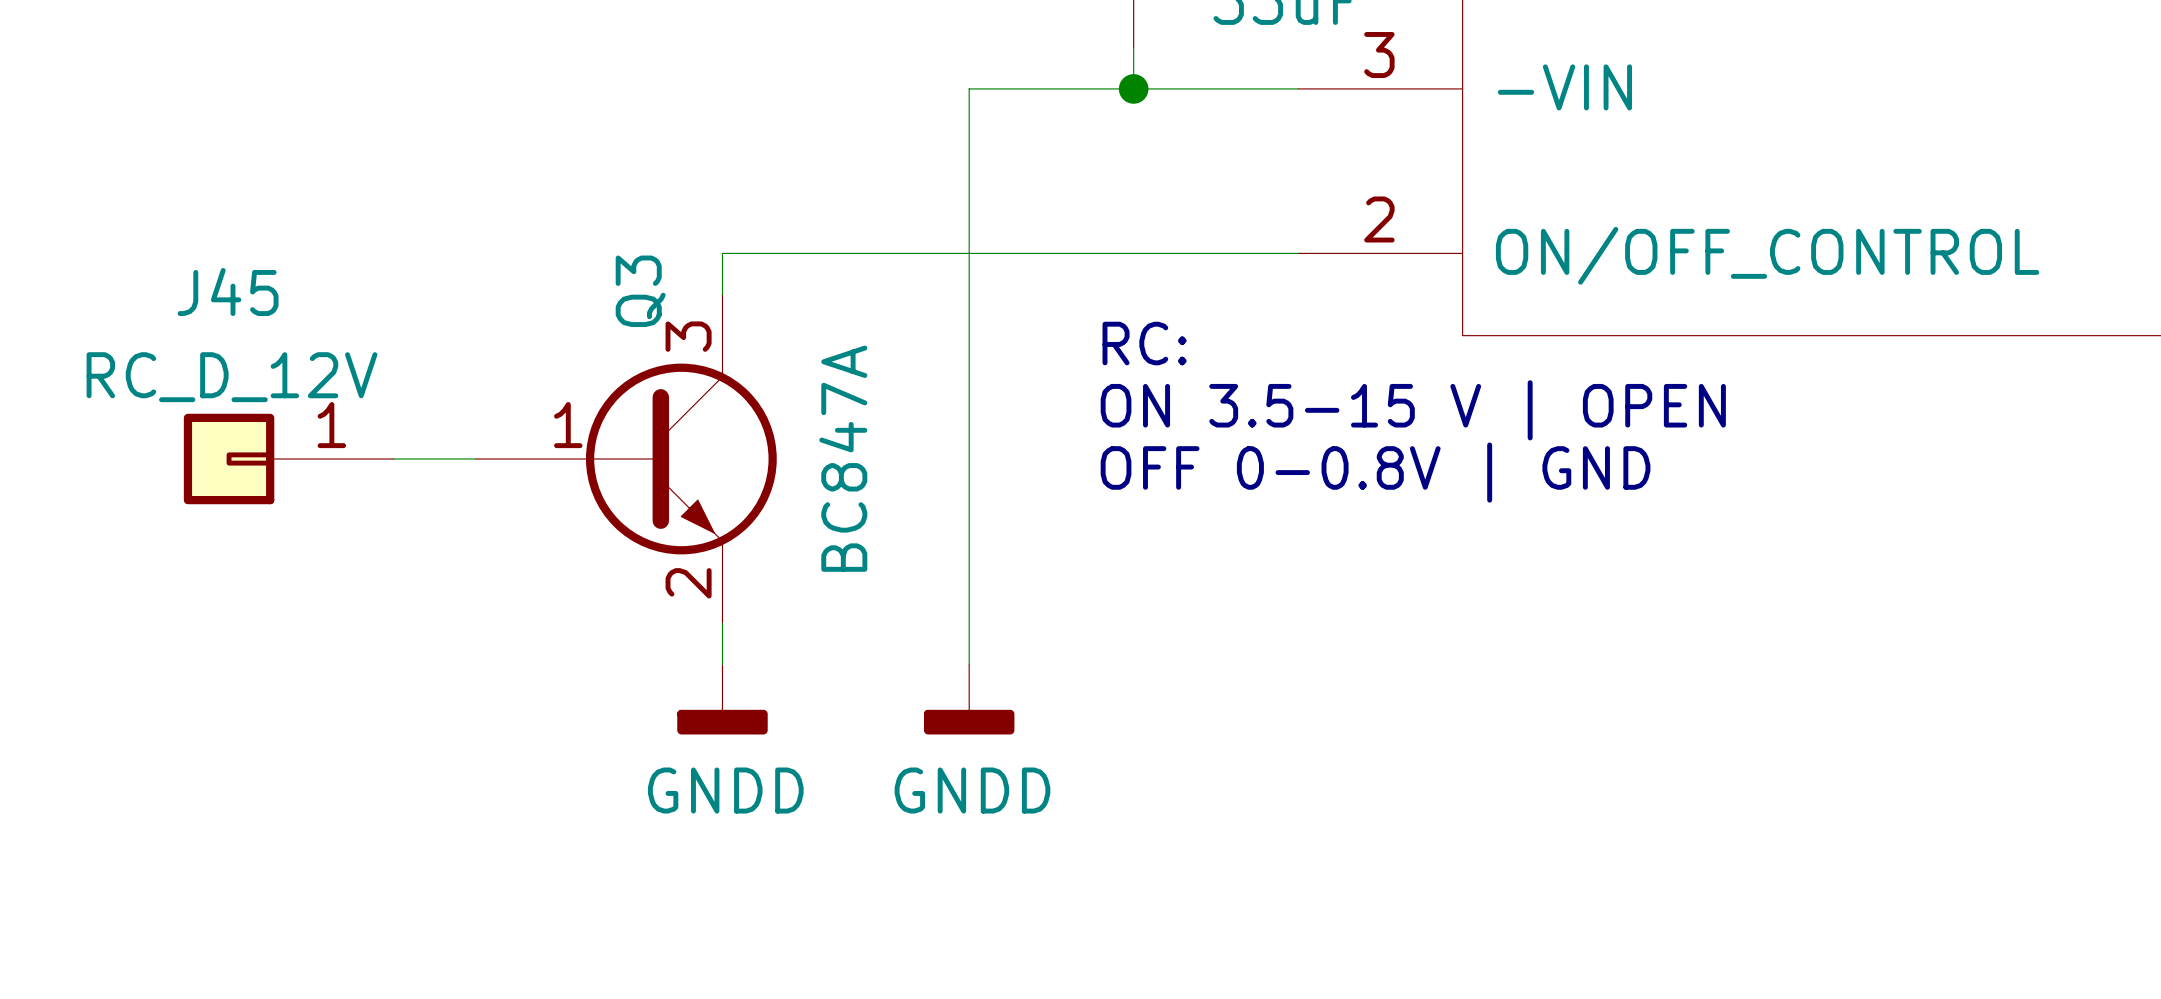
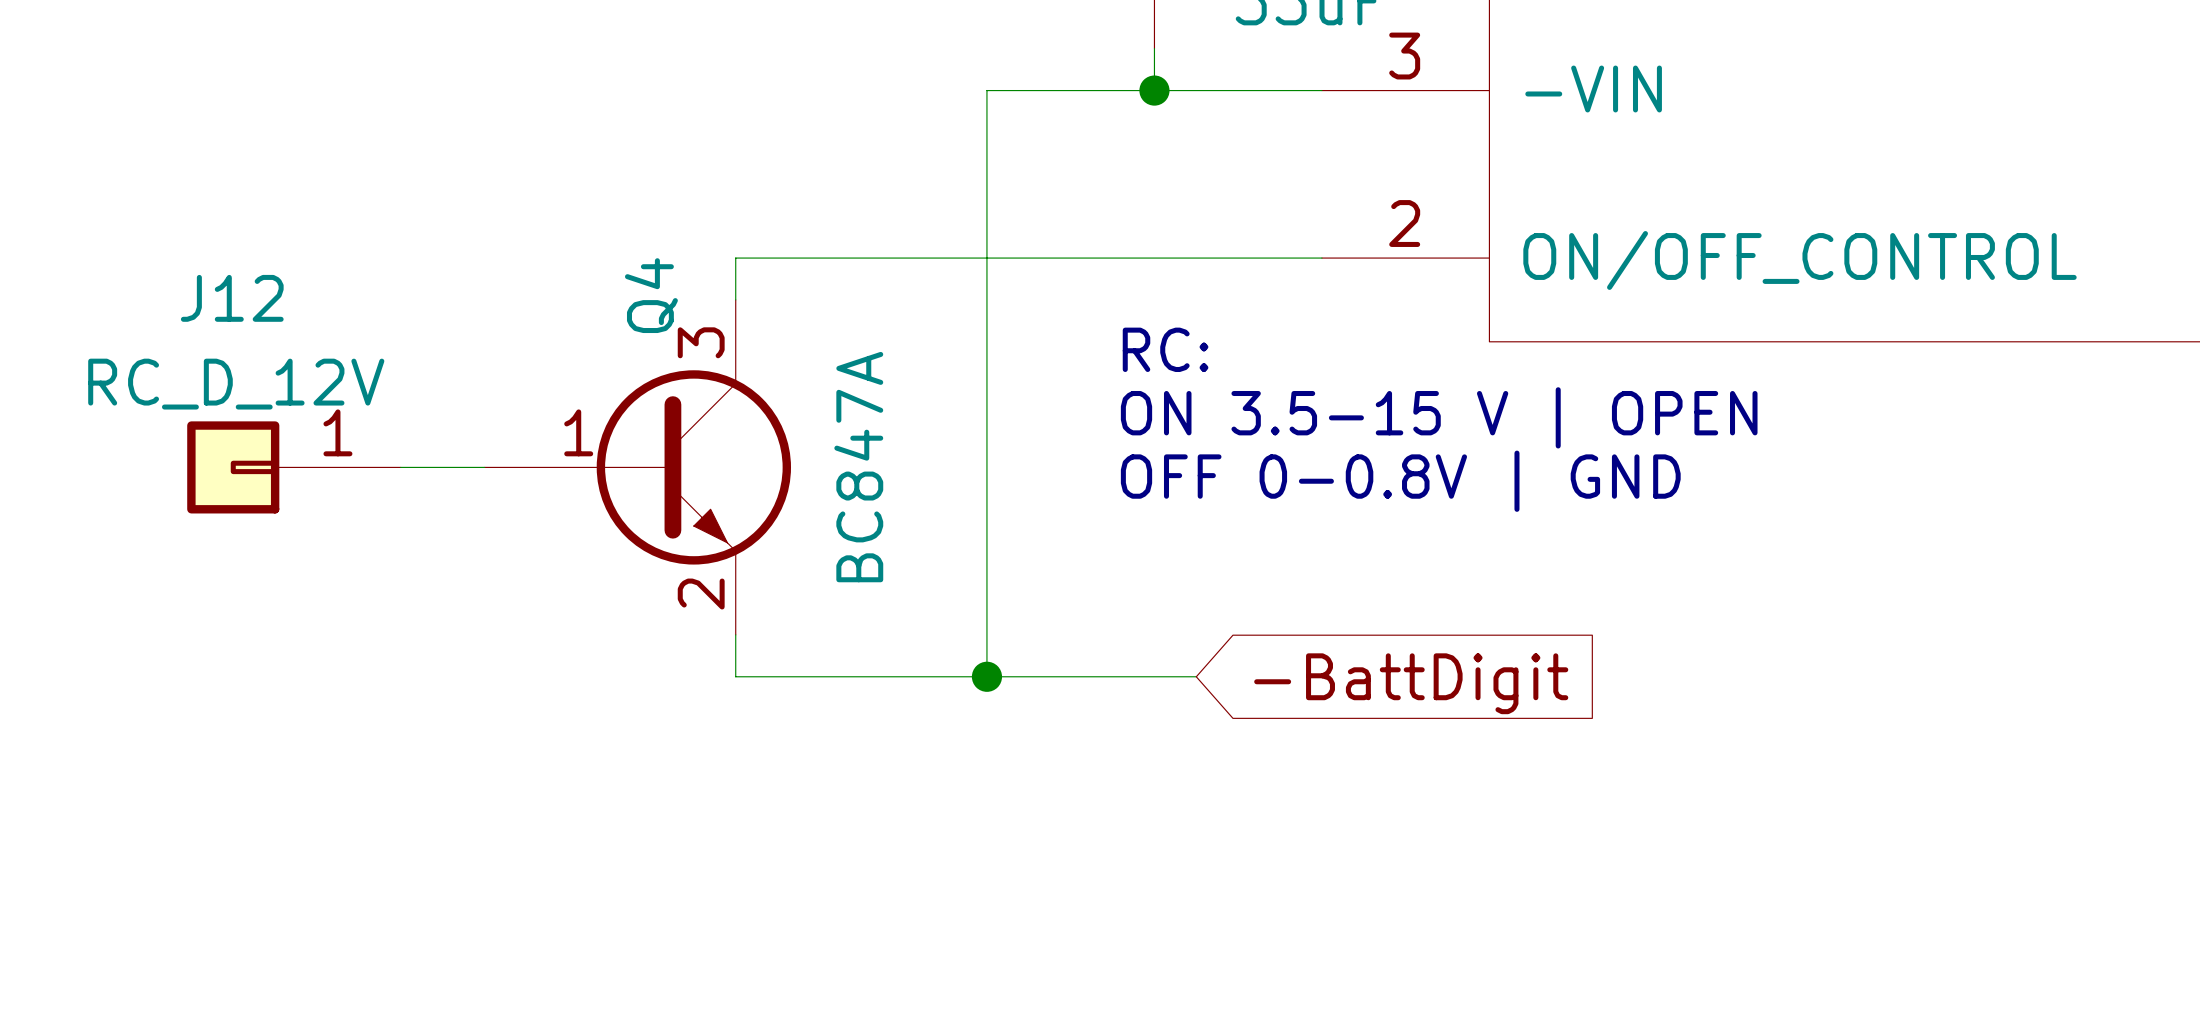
Q3 name: Q3 (640, 291) -> Q4 (651, 295)
J45 name: J45 (228, 292) -> J12 (232, 298)
wire: none -> (735, 676) (1196, 676)
junction: none -> (986, 676)
global label: none -> -BattDigit (1411, 683)
power symbol: GNDD (722, 699) -> none
power symbol: GNDD (969, 699) -> none

